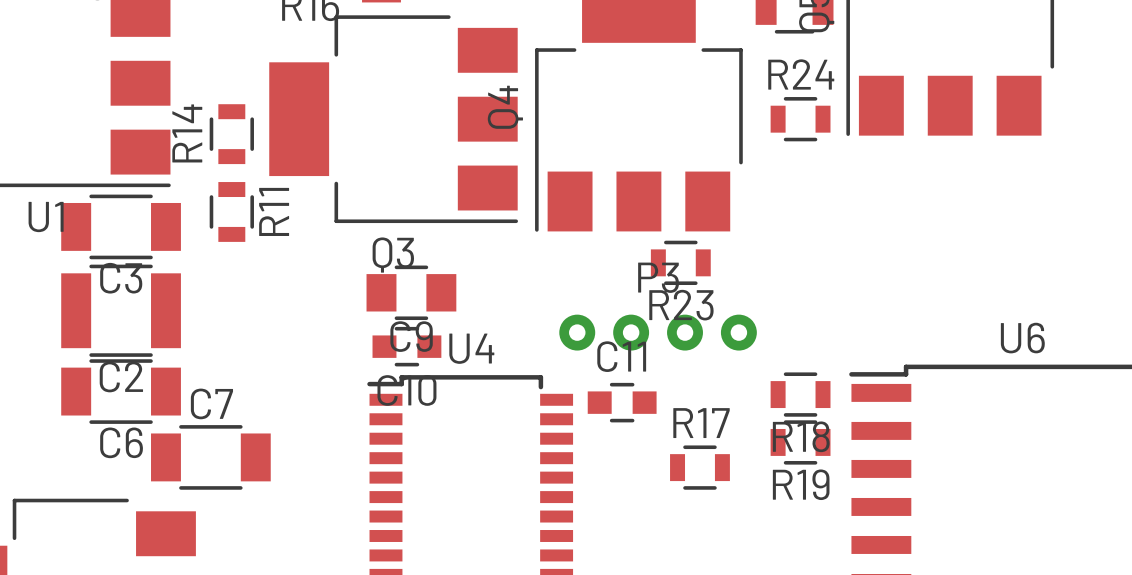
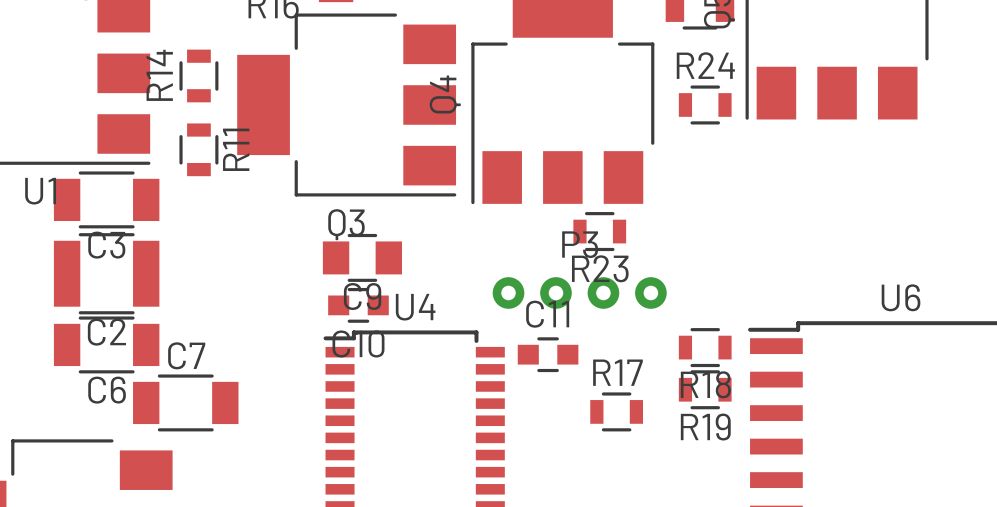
R14 position: (231, 134) -> (198, 75)
R11 position: (231, 211) -> (198, 149)

